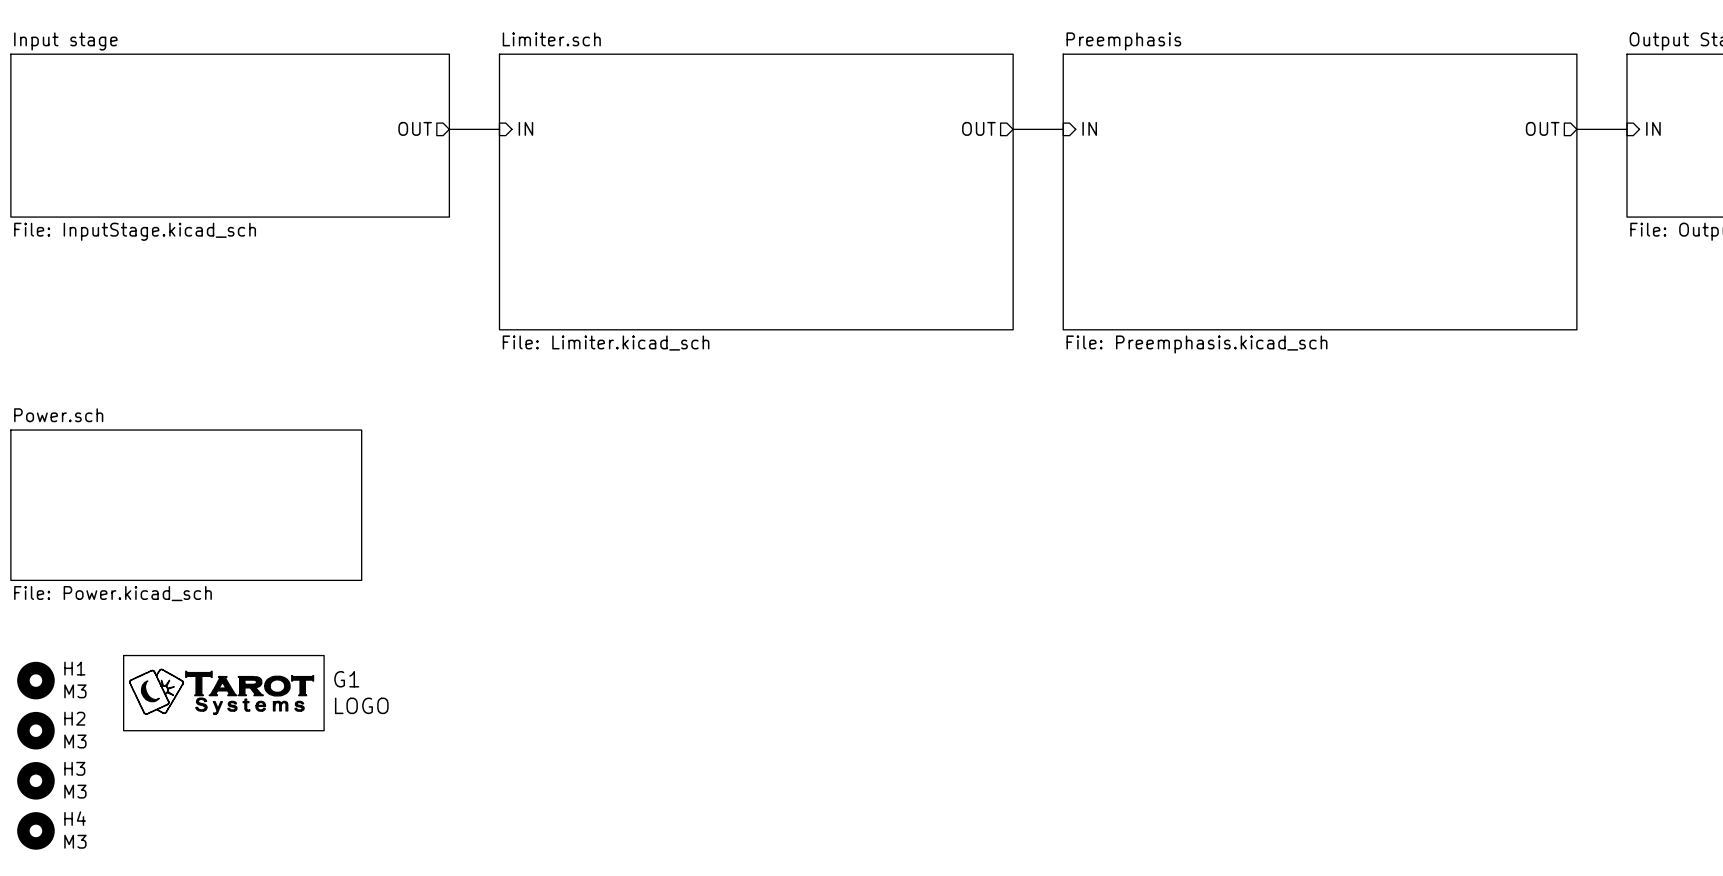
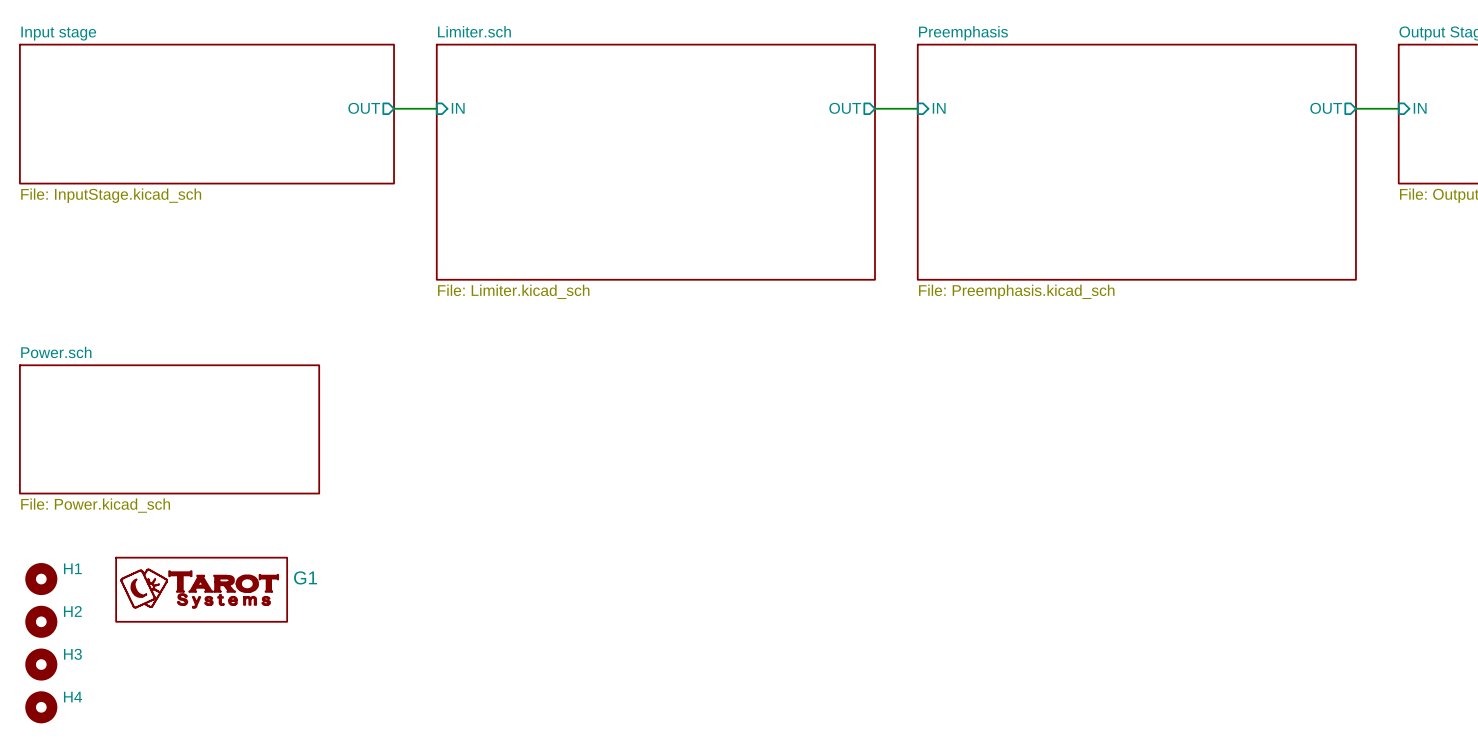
H1 value: M3 (75, 691) -> none
G1 value: LOGO (361, 705) -> none
H2 value: M3 (75, 741) -> none
H3 value: M3 (75, 791) -> none
H4 value: M3 (75, 841) -> none

